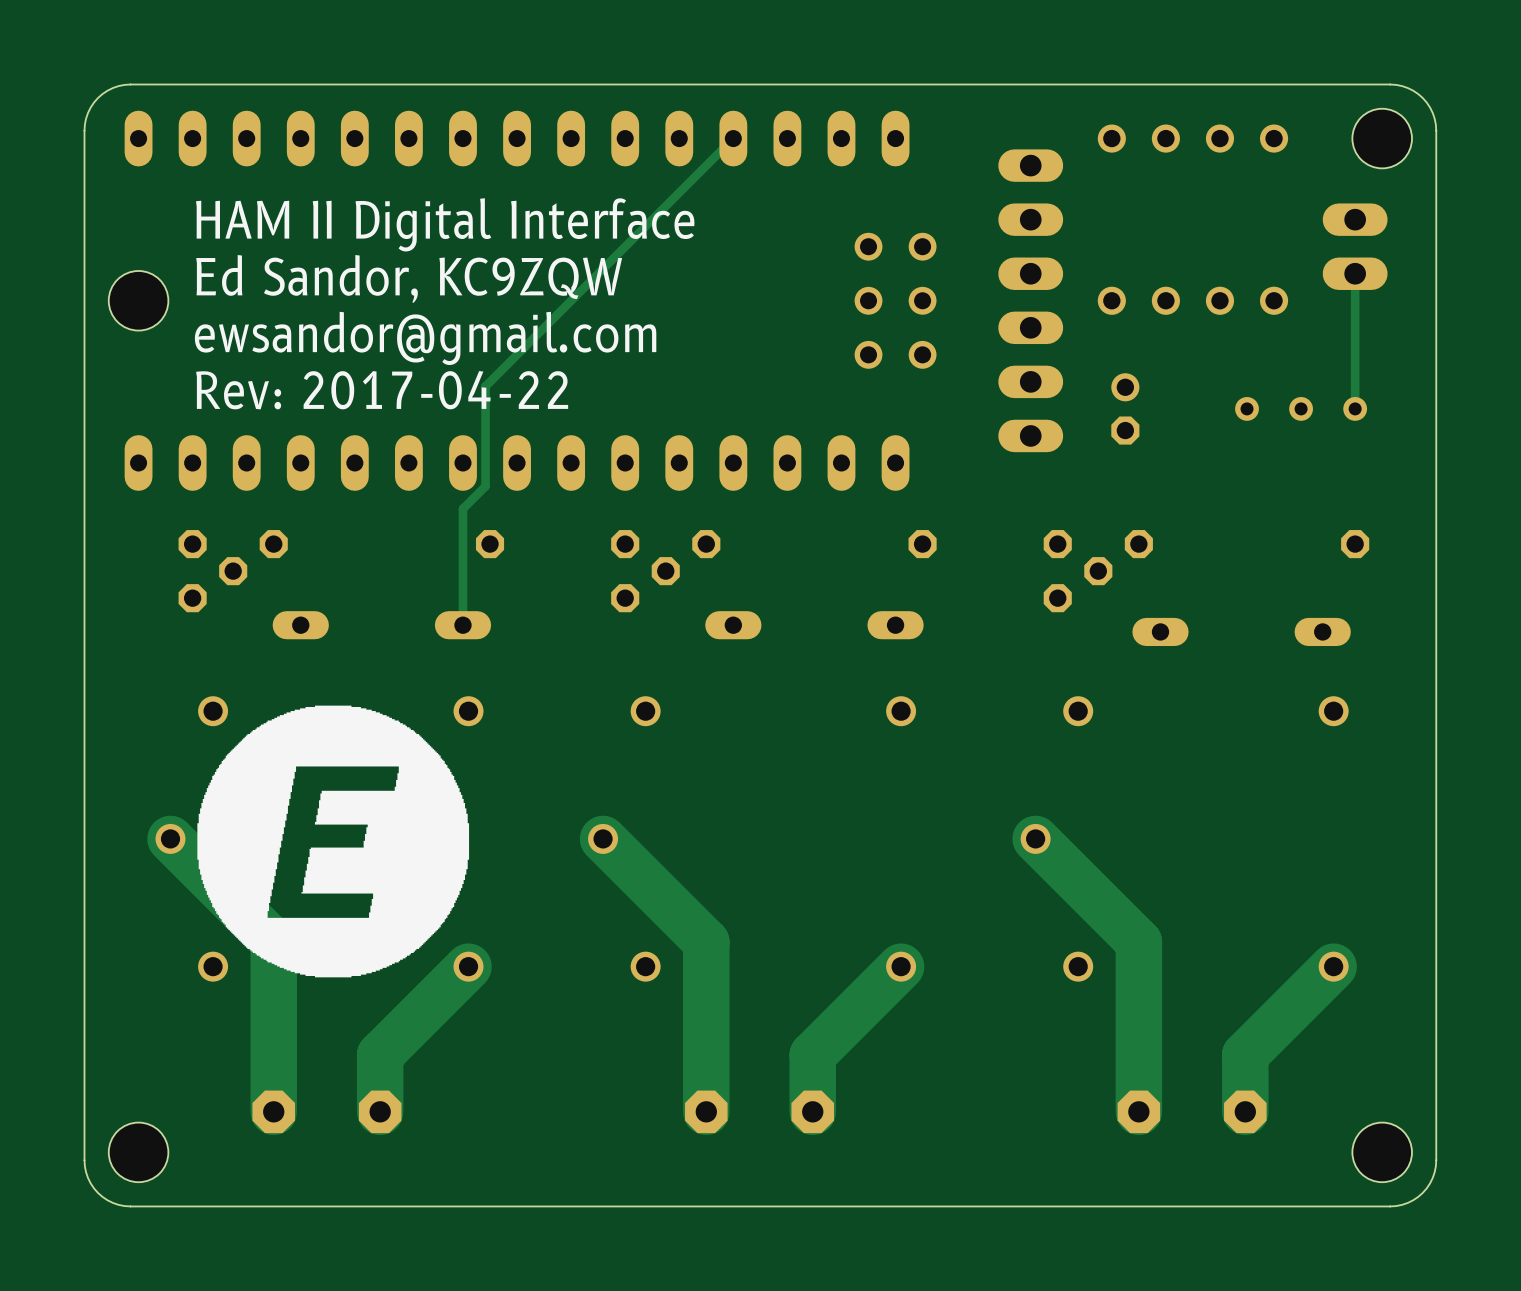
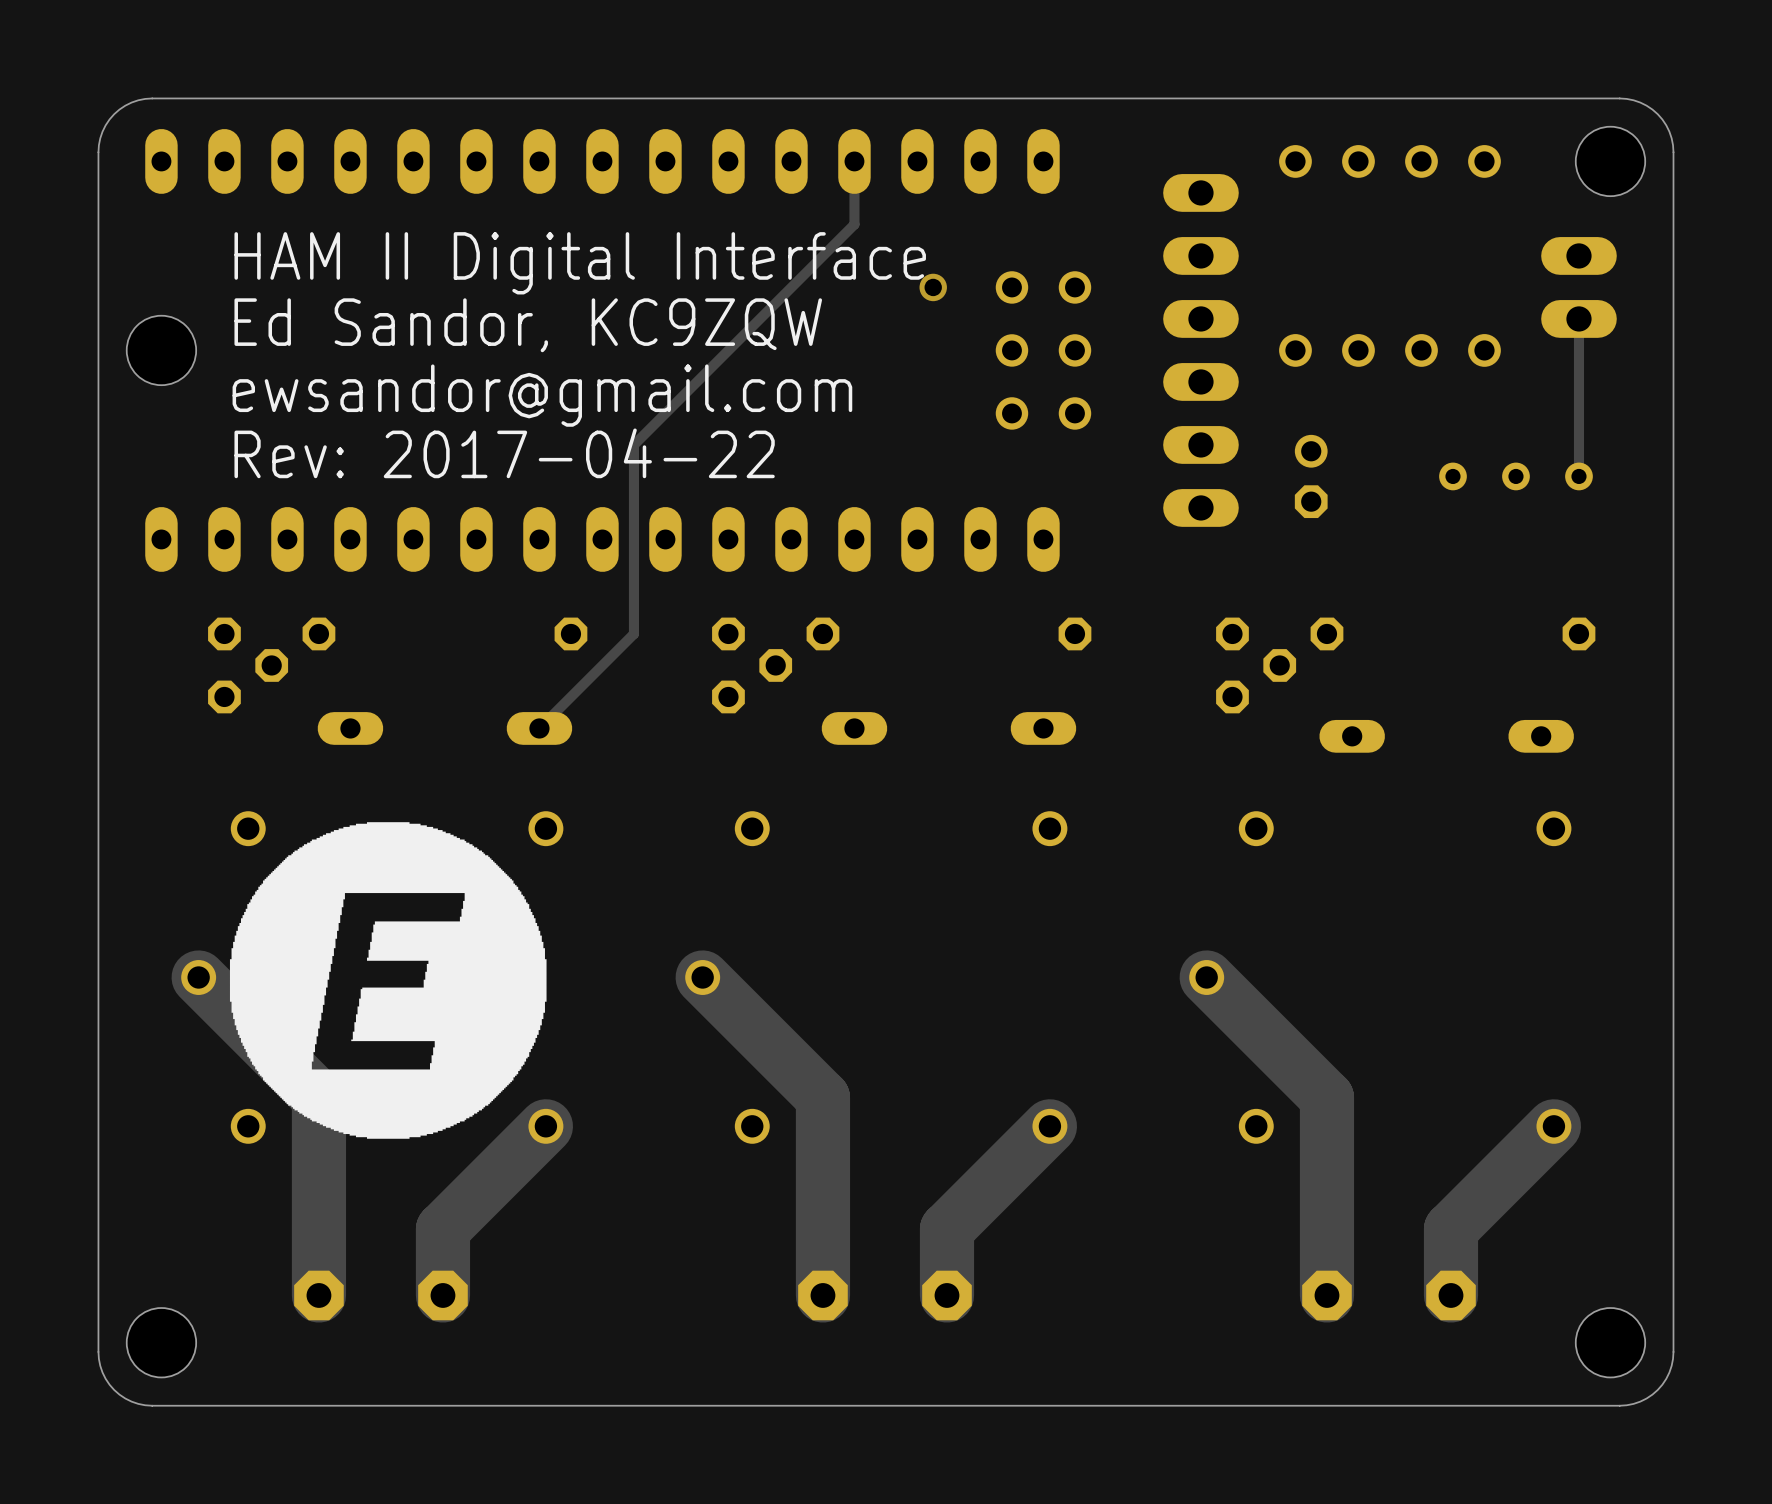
track: (733, 138) (485, 386) (485, 486) (462, 508) (462, 625) -> (854, 161) (854, 224) (633, 444) (633, 633) (539, 728)
via: none -> (933, 287)

